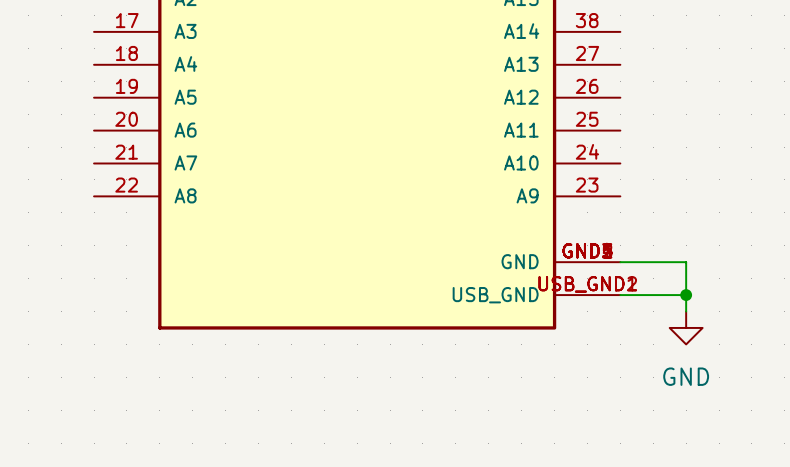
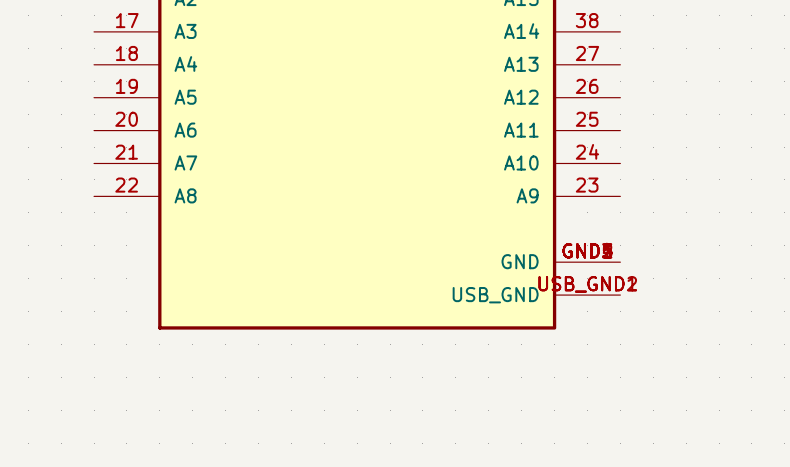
wire: (620, 262) (686, 262) (686, 311) -> none
wire: (620, 295) (686, 295) -> none
junction: (686, 295) -> none
power symbol: GND (686, 327) -> none

